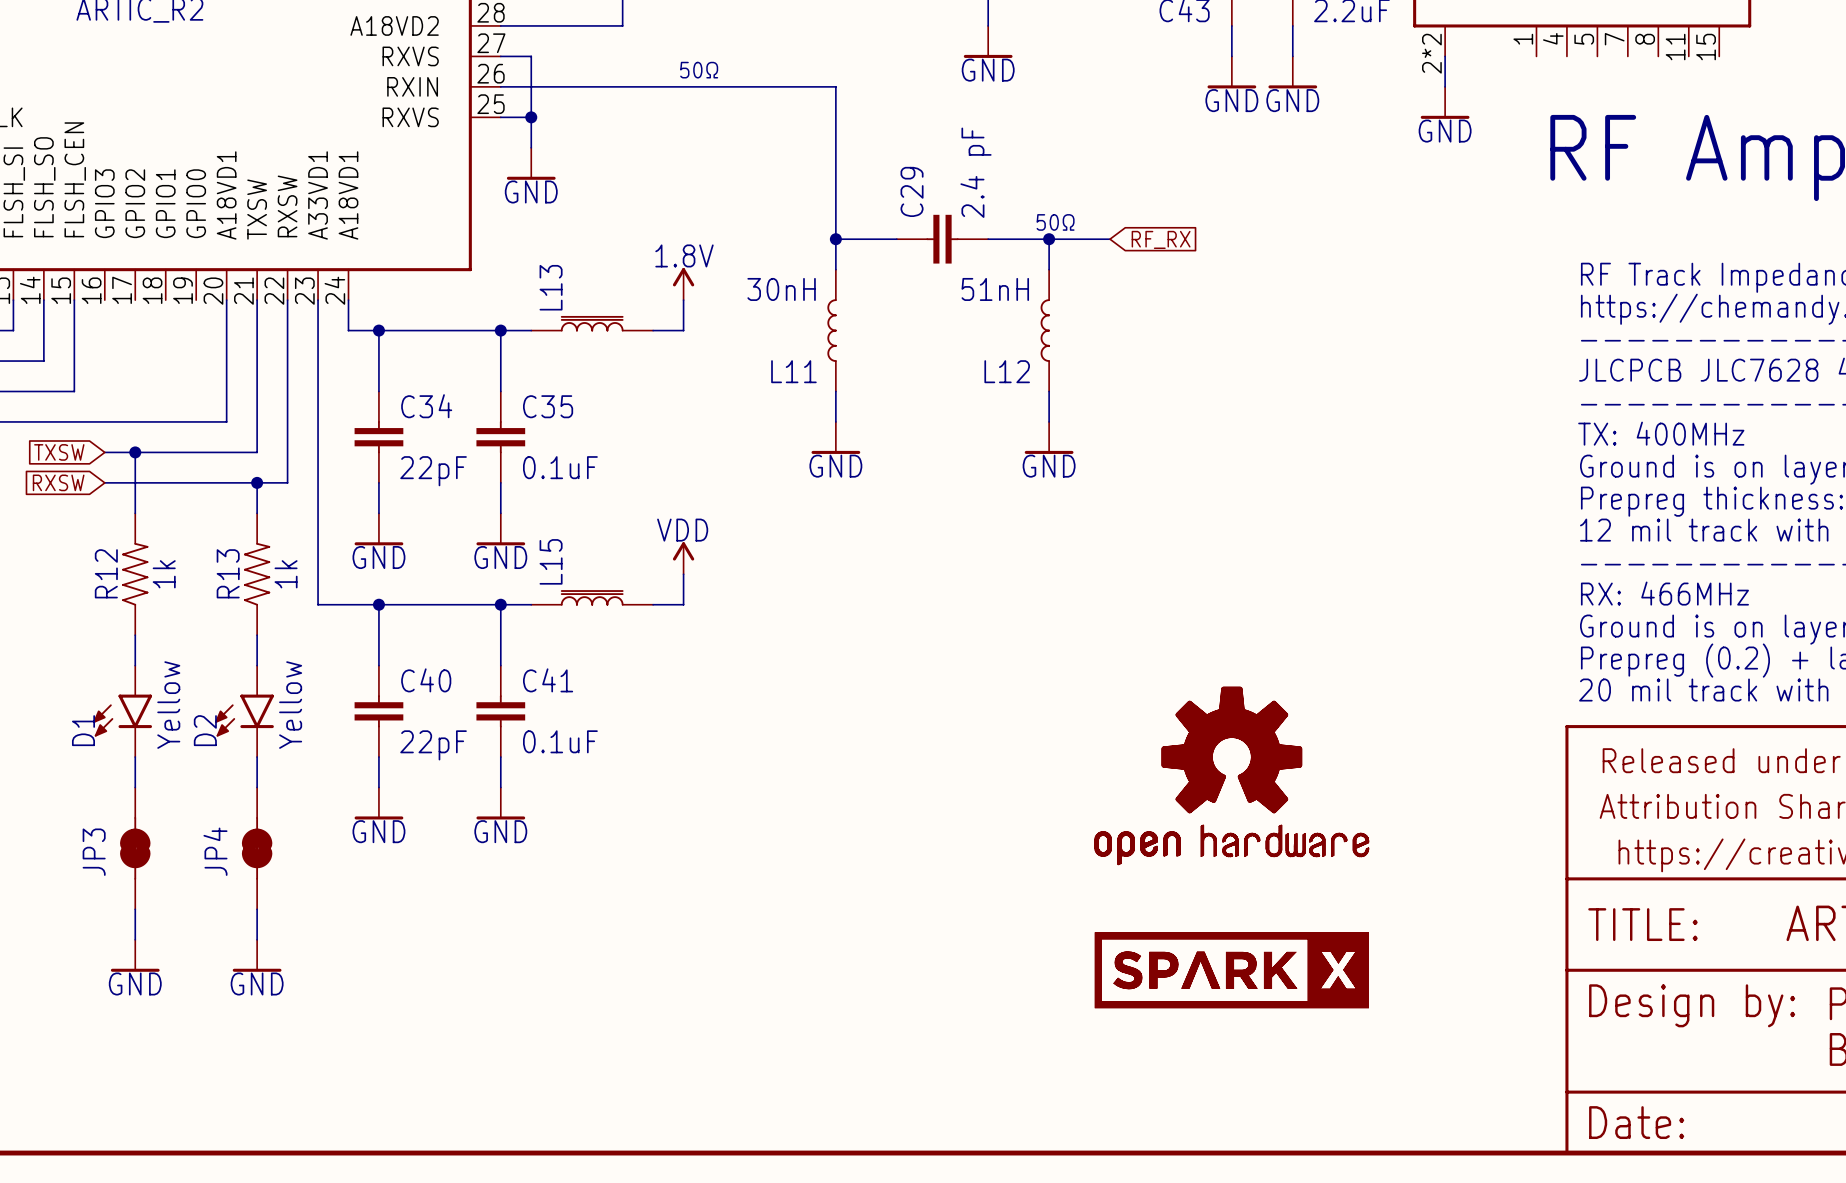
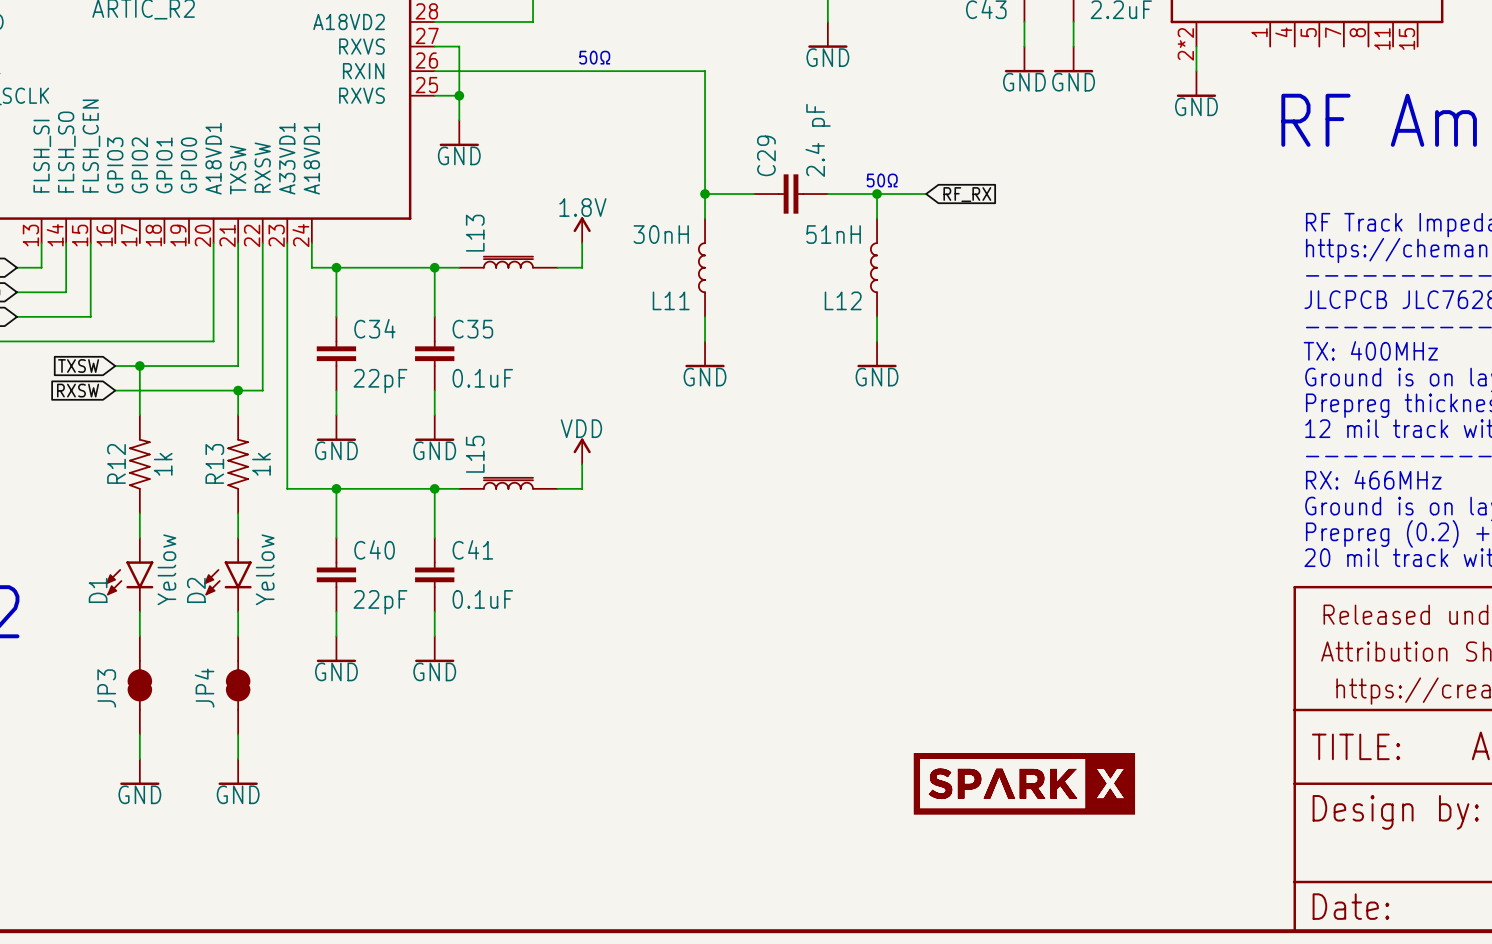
part: (1231, 775) -> none

